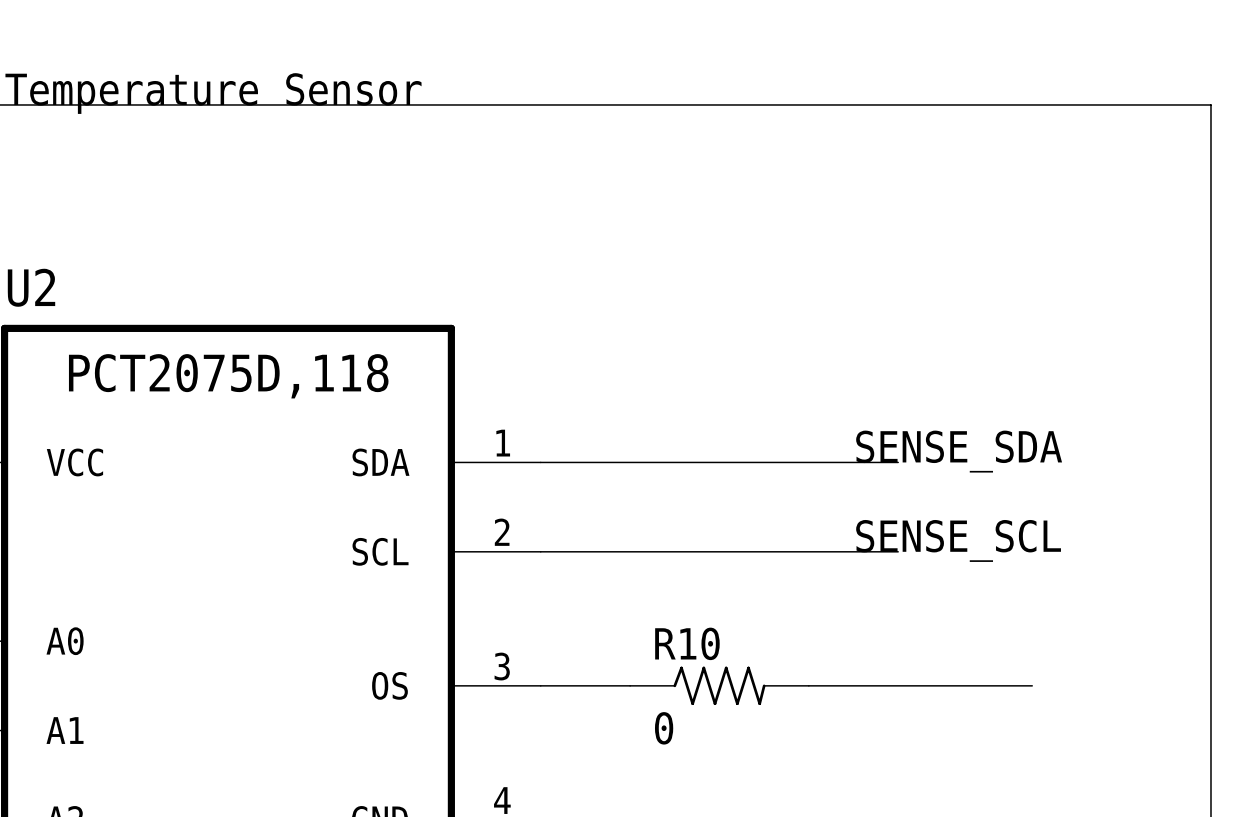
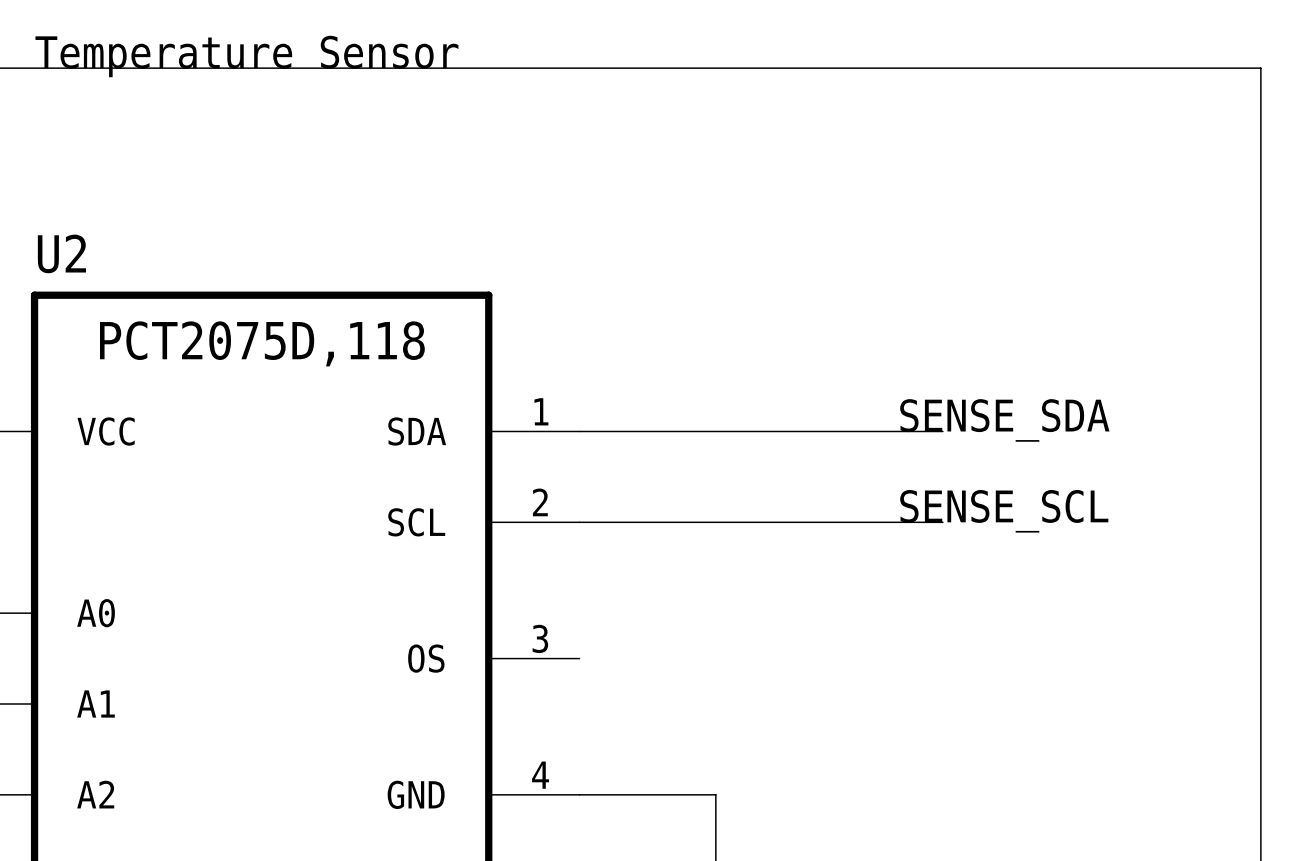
wire: (540, 685) (630, 685) -> none
R10: 0 (719, 685) -> none
wire: (808, 685) (1032, 685) -> none

